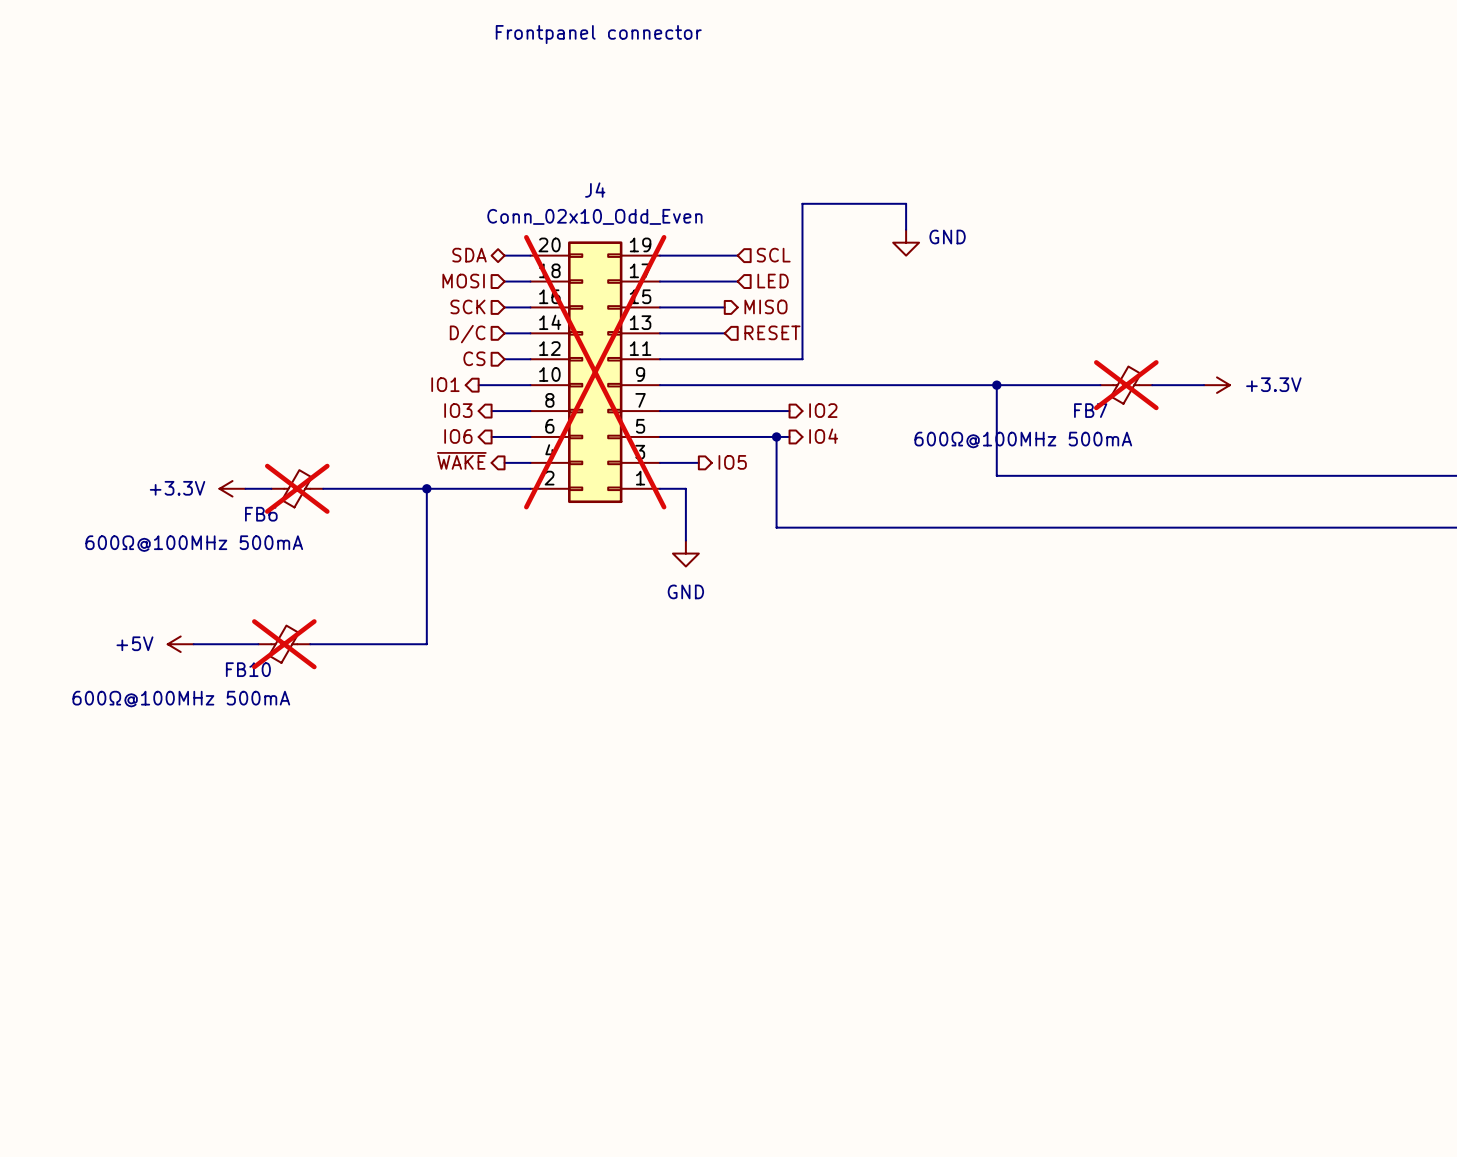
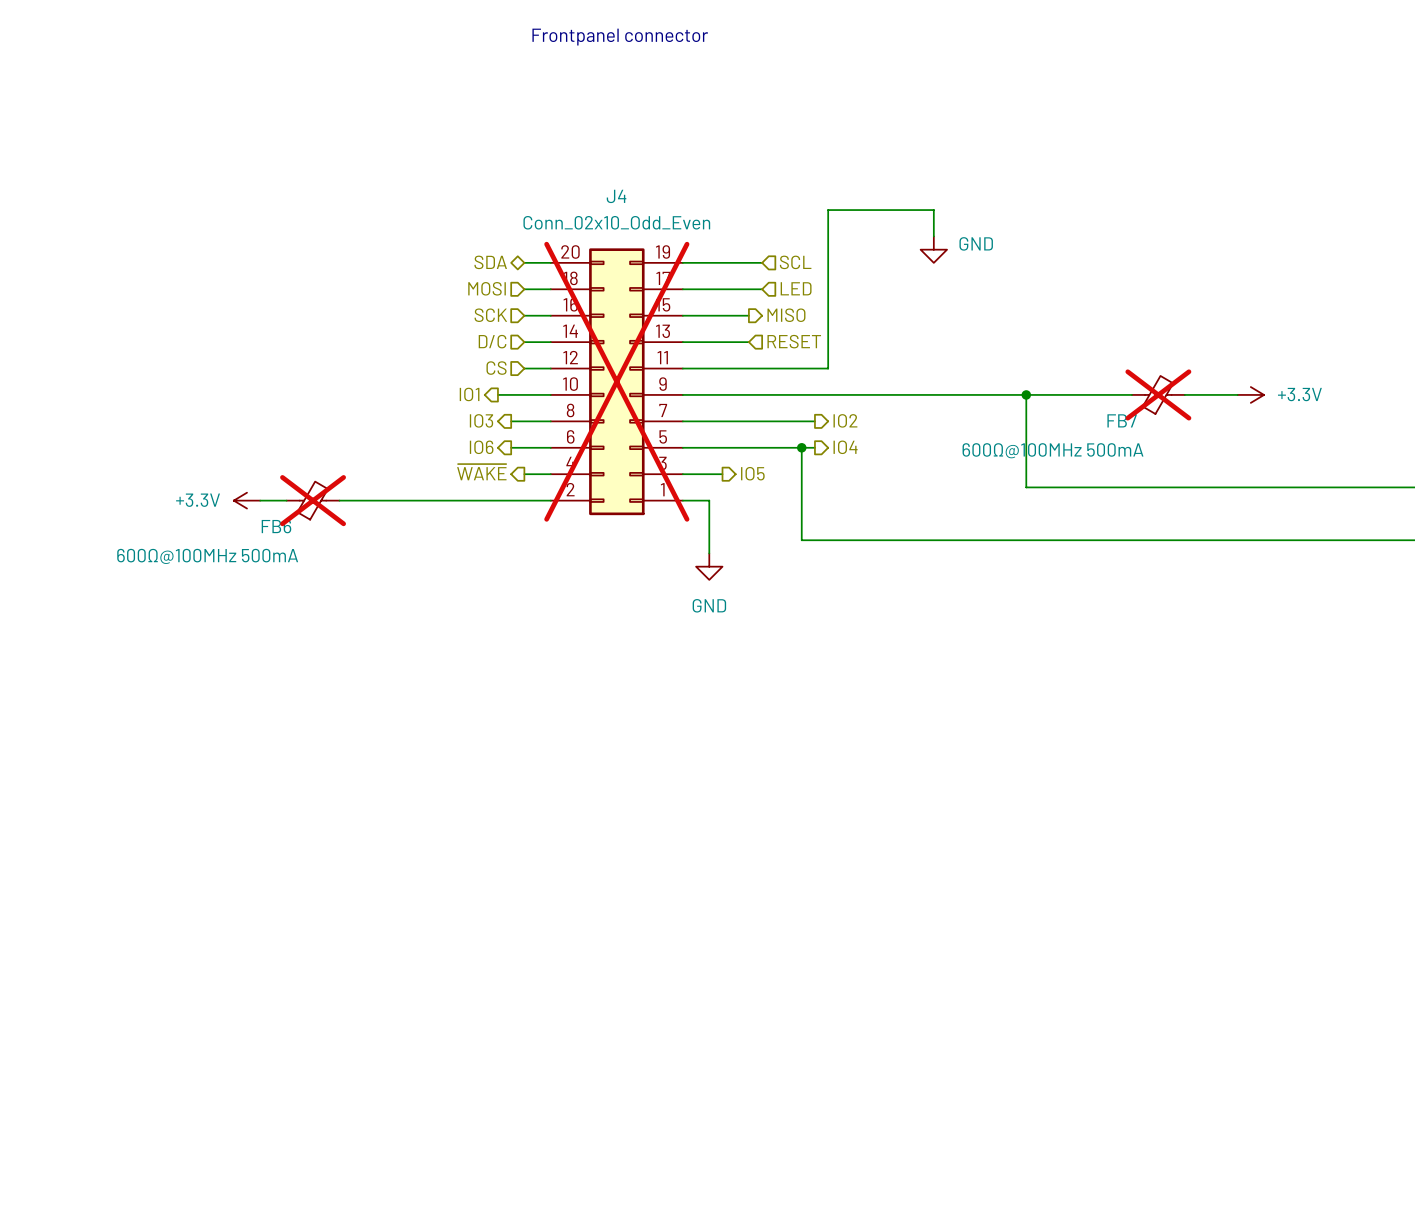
wire: (426, 488) (426, 644) (310, 644) -> none
junction: (426, 488) -> none
power symbol: +5V (180, 644) -> none
wire: (193, 644) (258, 644) -> none
FB10: 600Ω@100MHz 500mA (284, 644) -> none

